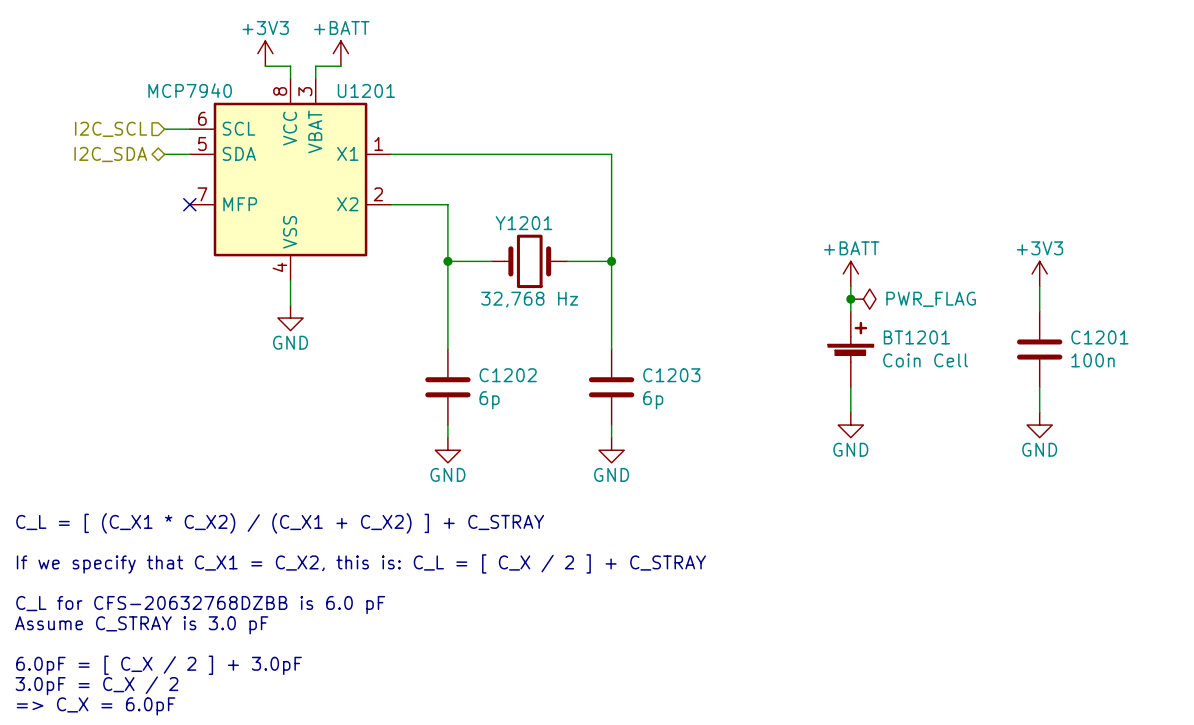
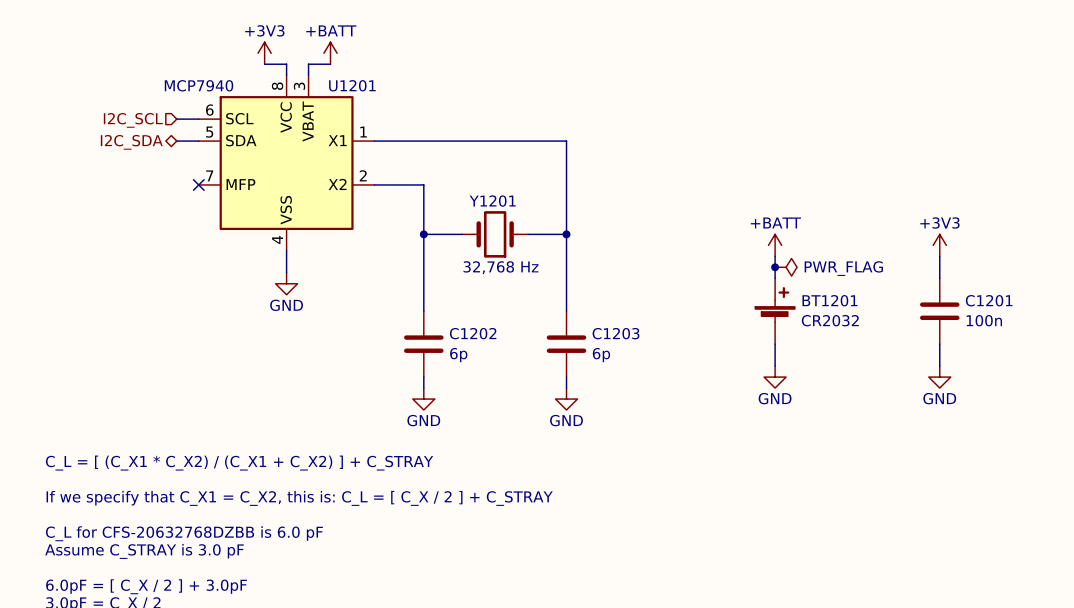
BT1201 value: Coin Cell (925, 360) -> CR2032 (830, 320)

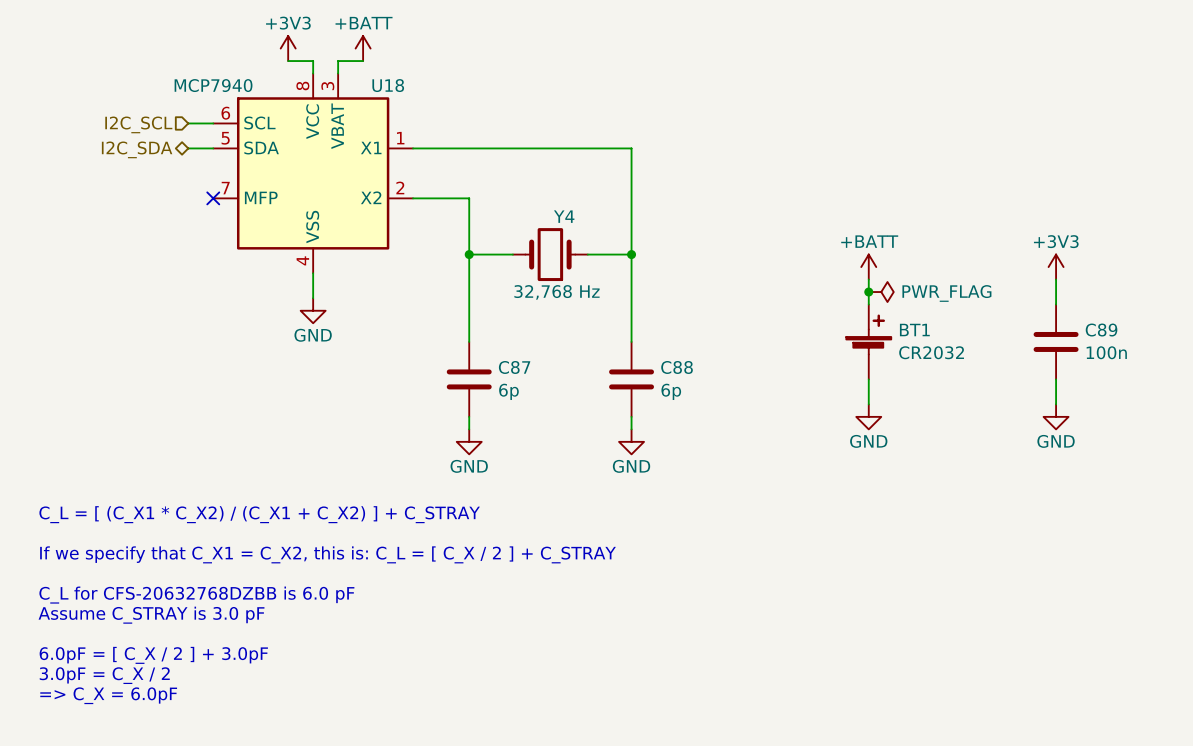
U1201 name: U1201 (352, 85) -> U18 (388, 85)
Y1201 name: Y1201 (492, 201) -> Y4 (564, 216)
BT1201 name: BT1201 (829, 300) -> BT1 (914, 330)
C1201 name: C1201 (989, 300) -> C89 (1101, 330)
C1202 name: C1202 (473, 333) -> C87 (514, 367)
C1203 name: C1203 (616, 333) -> C88 (677, 367)

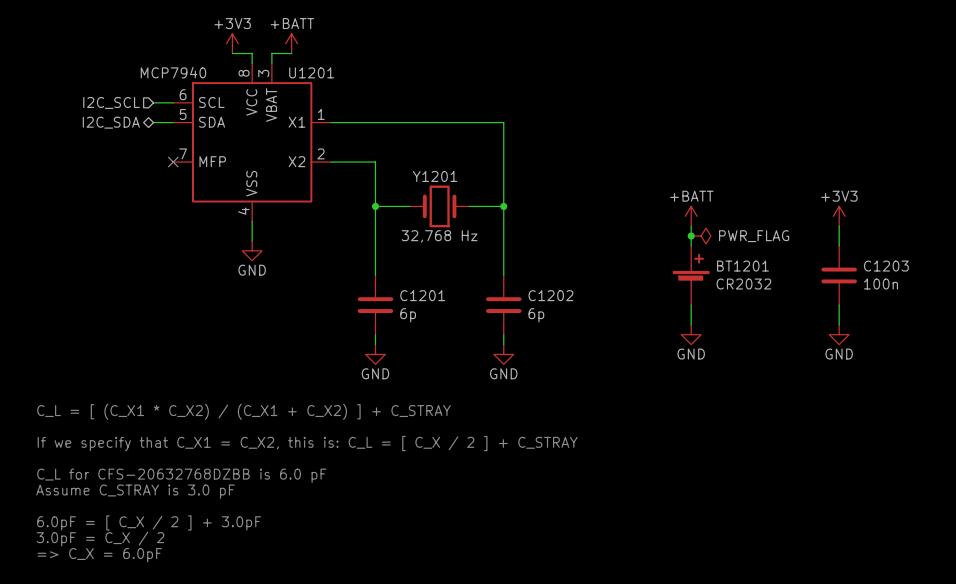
U18 name: U18 (388, 85) -> U1201 (311, 72)
Y4 name: Y4 (564, 216) -> Y1201 (435, 176)
BT1 name: BT1 (914, 330) -> BT1201 (742, 266)
C89 name: C89 (1101, 330) -> C1203 (886, 266)
C87 name: C87 (514, 367) -> C1201 (422, 295)
C88 name: C88 (677, 367) -> C1202 (550, 295)

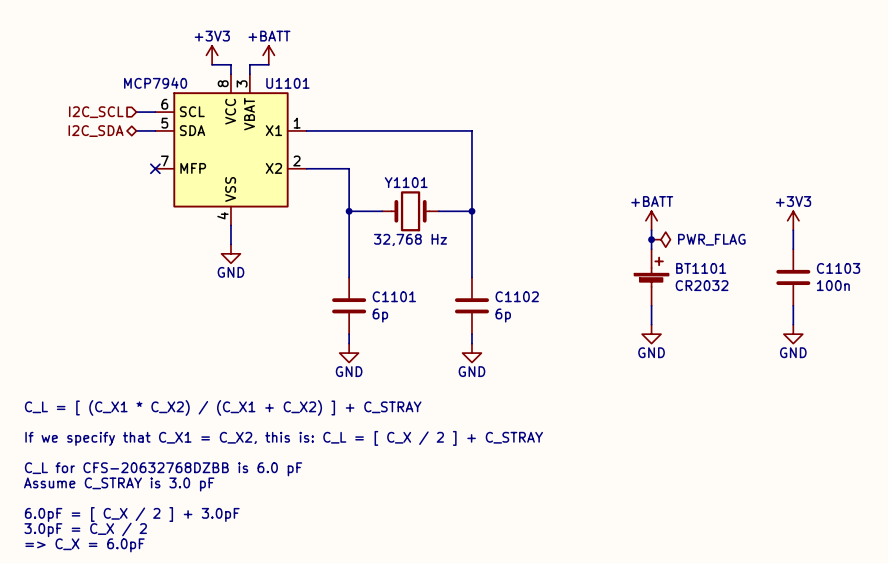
U1201 name: U1201 (311, 72) -> U1101 (287, 83)
Y1201 name: Y1201 (435, 176) -> Y1101 (406, 182)
BT1201 name: BT1201 (742, 266) -> BT1101 (701, 268)
C1203 name: C1203 (886, 266) -> C1103 (838, 268)
C1201 name: C1201 (422, 295) -> C1101 (394, 296)
C1202 name: C1202 (550, 295) -> C1102 (517, 296)

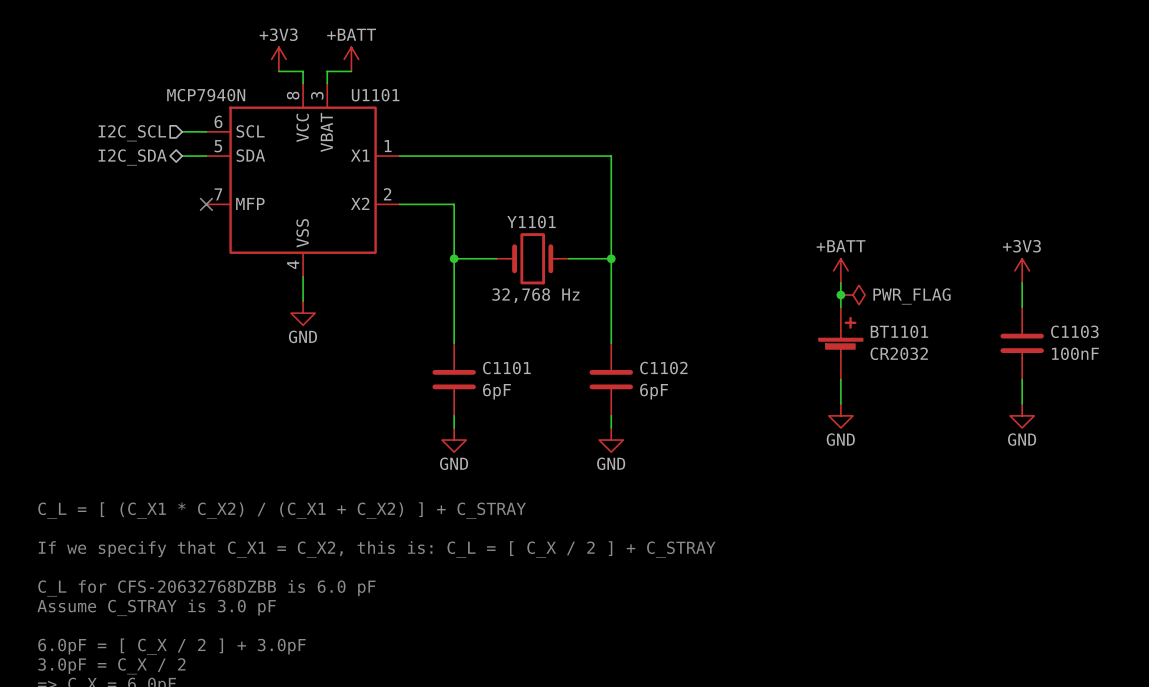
U1101 value: MCP7940 (155, 83) -> MCP7940N (206, 95)
C1103 value: 100n (833, 285) -> 100nF (1075, 353)
C1101 value: 6p (380, 315) -> 6pF (496, 391)
C1102 value: 6p (503, 315) -> 6pF (654, 391)

